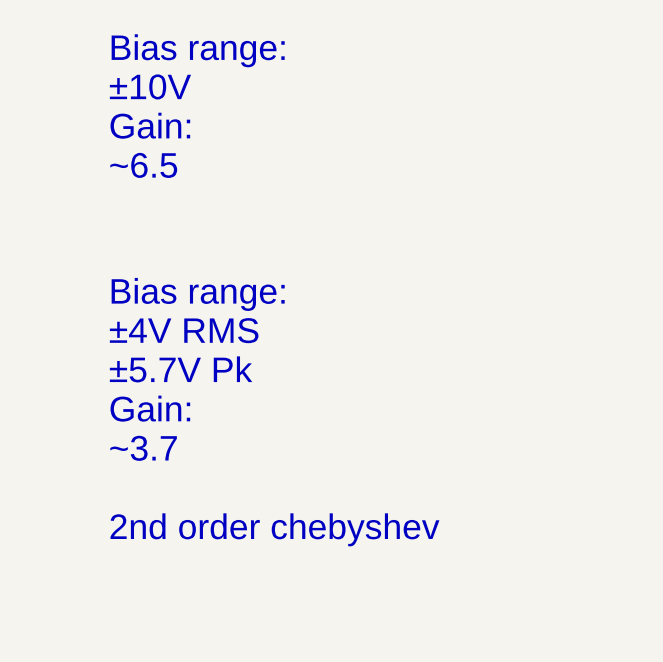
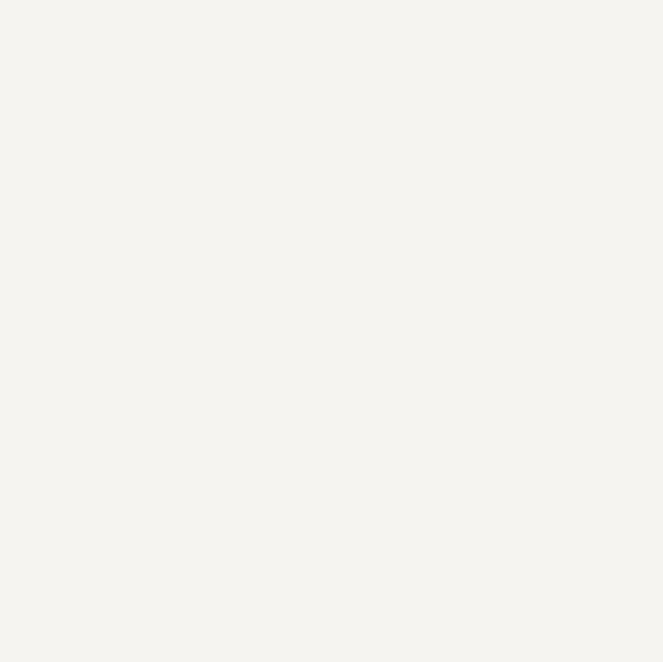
text: Bias range: (198, 50) -> none
text: ±10V (150, 86) -> none
text: Gain: (150, 125) -> none
text: ~6.5 (143, 165) -> none
text: Bias range: (198, 294) -> none
text: ±4V RMS (184, 330) -> none
text: ±5.7V Pk (181, 369) -> none
text: Gain: (150, 408) -> none
text: ~3.7 (143, 448) -> none
text: 2nd order chebyshev (274, 529) -> none

